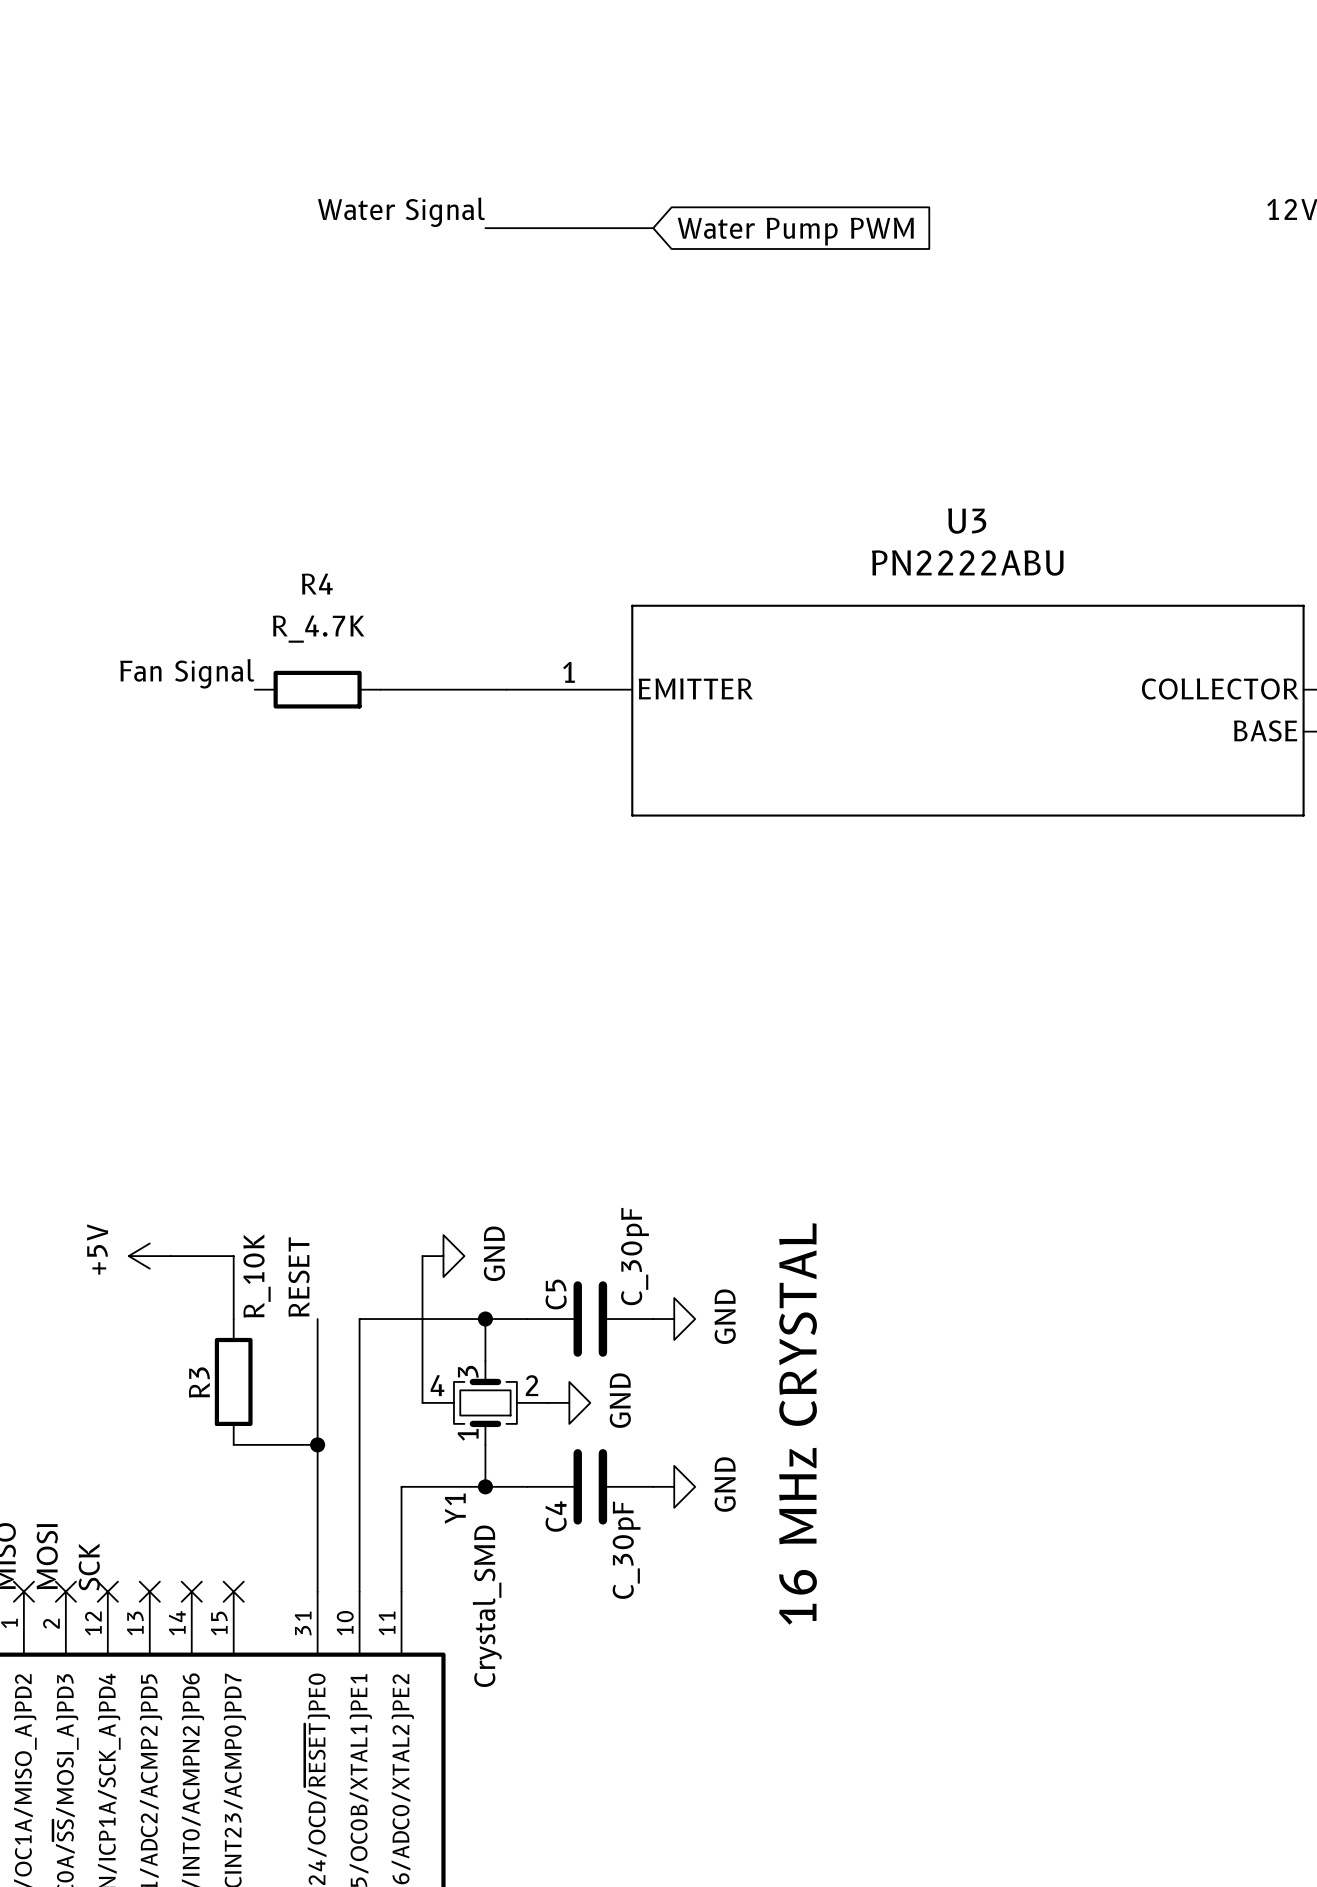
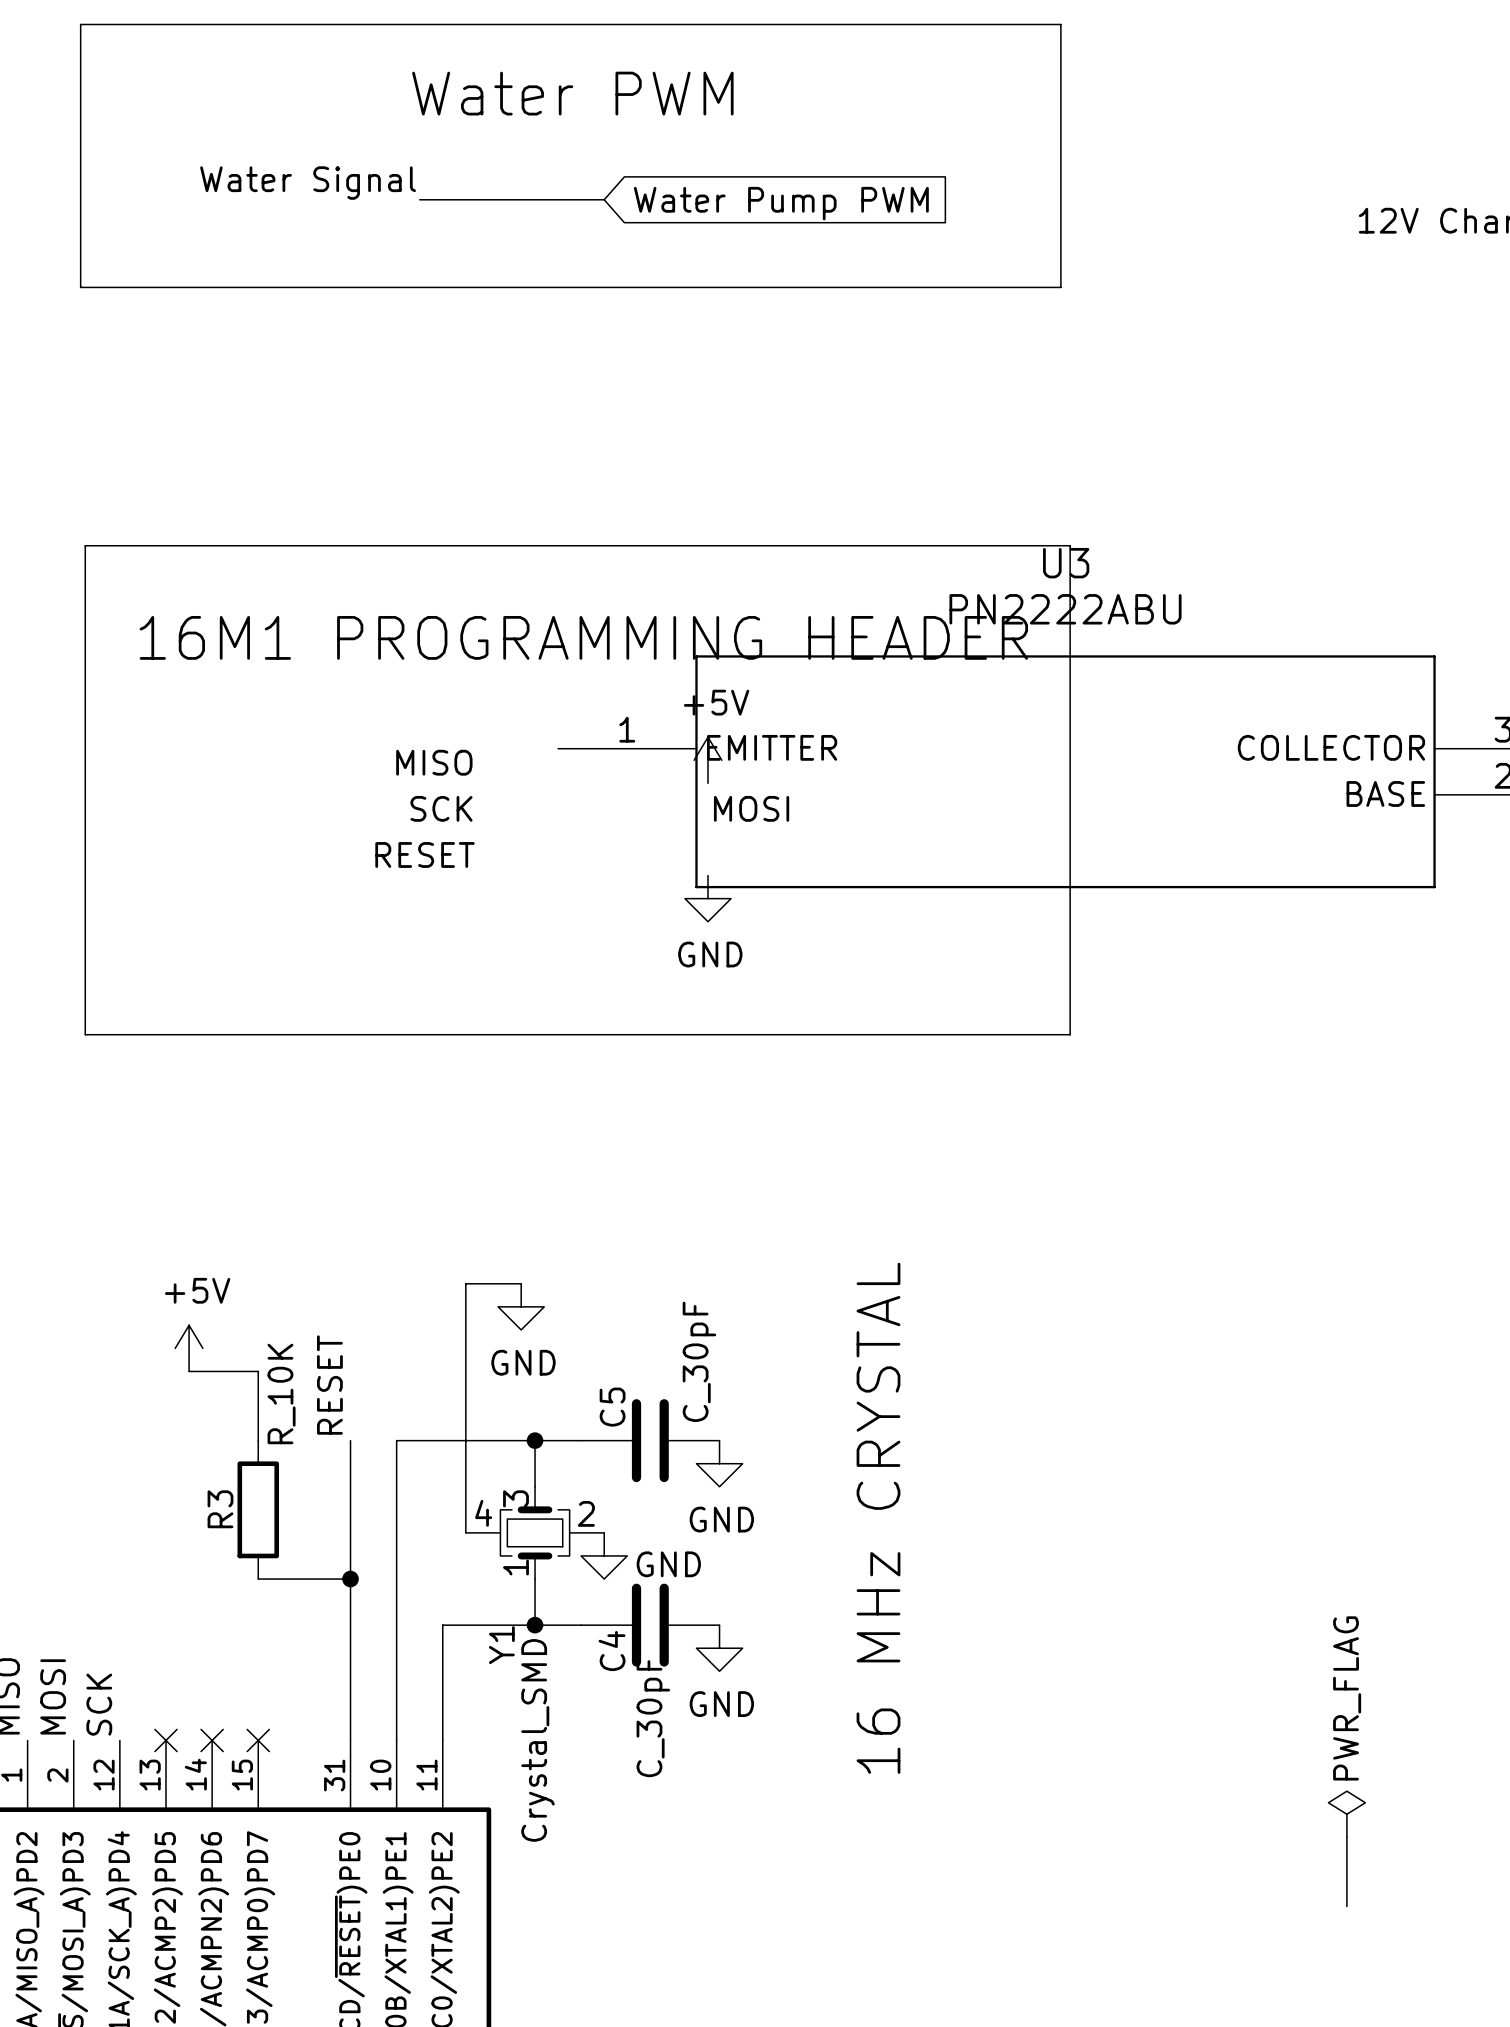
line: none -> (80, 24) (1060, 24) (1060, 287) (80, 287) (80, 24)
text: none -> Water PWM (572, 93)
label position: Water Signal (401, 212) -> Water Signal (308, 183)
wire: (485, 228) (653, 228) -> (419, 199) (604, 199)
global label position: Water Pump PWM (795, 231) -> Water Pump PWM (781, 203)
line: none -> (85, 545) (1070, 545) (1070, 1034) (85, 1034) (85, 545)
text: none -> 16M1 PROGRAMMING HEADER (583, 637)
label: Fan Signal (187, 673) -> none
R4: R_4.7K (317, 689) -> none
wire: (380, 689) (506, 689) -> none
power symbol: none -> +5V (708, 760)
label: none -> MISO (434, 762)
label: none -> SCK (441, 808)
label: none -> MOSI (751, 808)
label: none -> RESET (425, 854)
power symbol: none -> GND (708, 898)
wire: none -> (521, 1283) (465, 1283) (465, 1371)
power symbol rotation: 0° (149, 1256) -> 90° clockwise (189, 1348)
power symbol position: +5V (149, 1256) -> +5V (189, 1348)
power symbol rotation: 0° (443, 1256) -> 90° clockwise (521, 1306)
power symbol position: GND (443, 1256) -> GND (521, 1306)
power symbol rotation: 0° (674, 1319) -> 90° clockwise (719, 1463)
power symbol position: GND (674, 1319) -> GND (719, 1463)
power symbol rotation: 0° (569, 1402) -> 90° clockwise (604, 1555)
power symbol position: GND (569, 1402) -> GND (604, 1555)
power symbol rotation: 0° (674, 1486) -> 90° clockwise (719, 1648)
power symbol position: GND (674, 1486) -> GND (719, 1648)
C4 value position: C_30pF (626, 1550) -> C_30pF (653, 1717)
no-connect mark: (23, 1591) -> none
no-connect mark: (65, 1591) -> none
no-connect mark: (107, 1591) -> none
power symbol: none -> PWR_FLAG (1346, 1814)
wire: none -> (1346, 1837) (1346, 1906)

